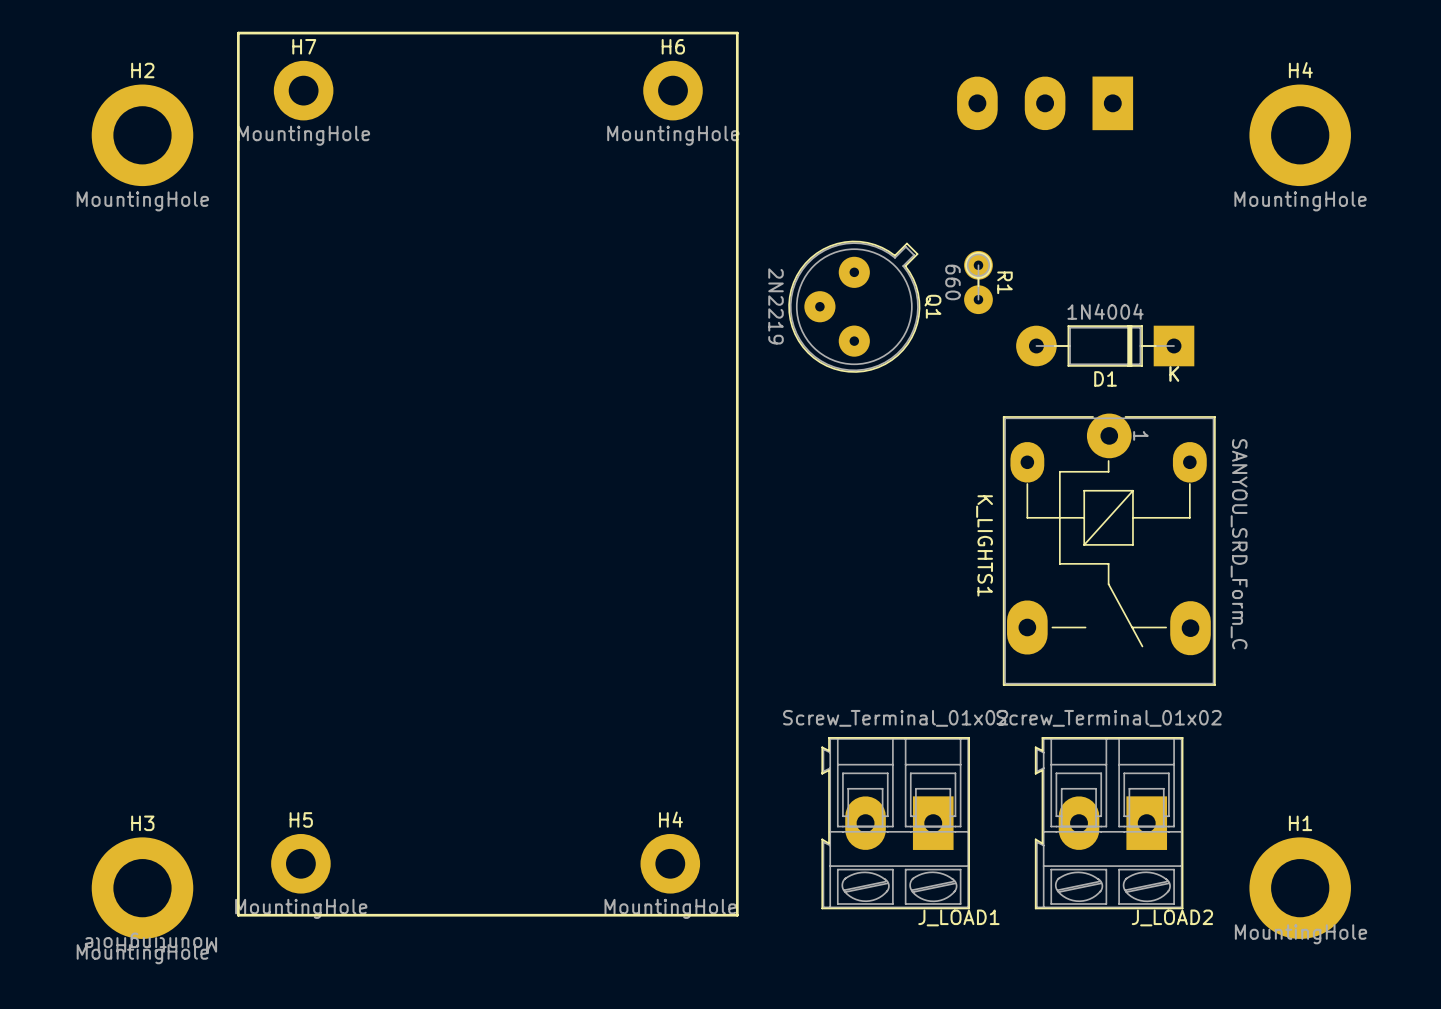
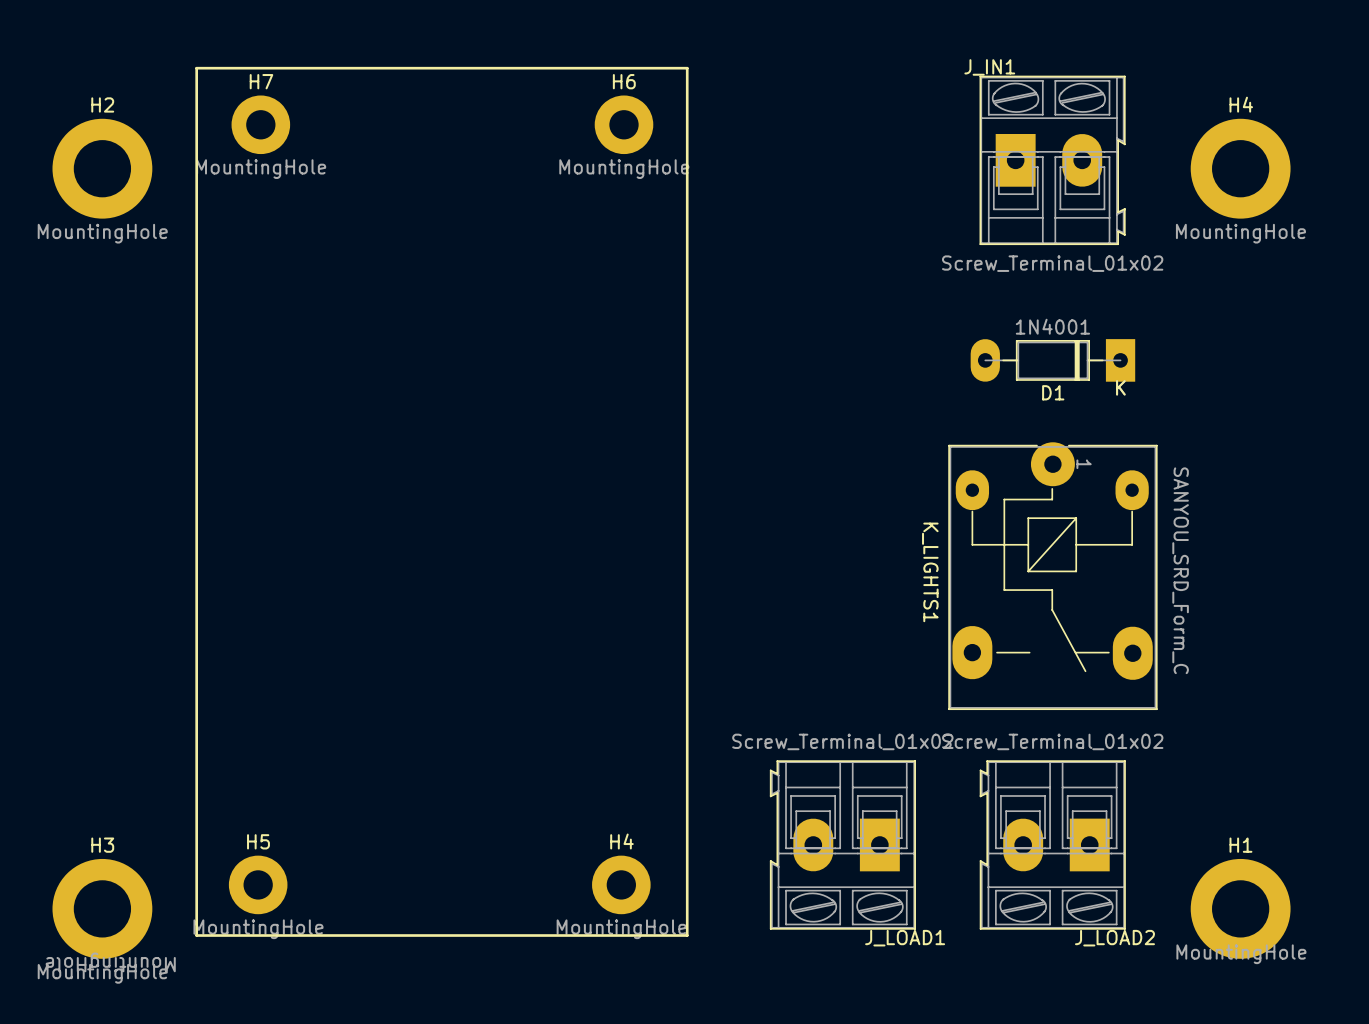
part: (1045, 103) -> none
J_IN1: none -> Screw_Terminal_01x02 (1052, 160)
R1: 660 (978, 282) -> none
Q1: 2N2219 (854, 306) -> none
D1 value: 1N4004 (1105, 311) -> 1N4001 (1052, 326)
D1 footprint: [1016, 325, 1195, 367] -> [970, 339, 1136, 382]

